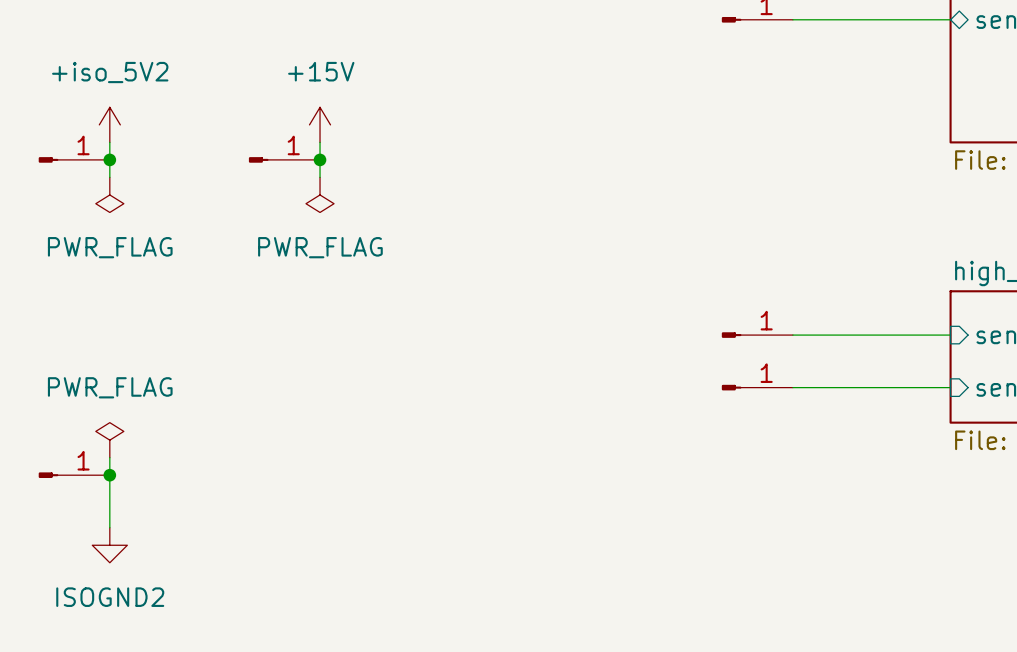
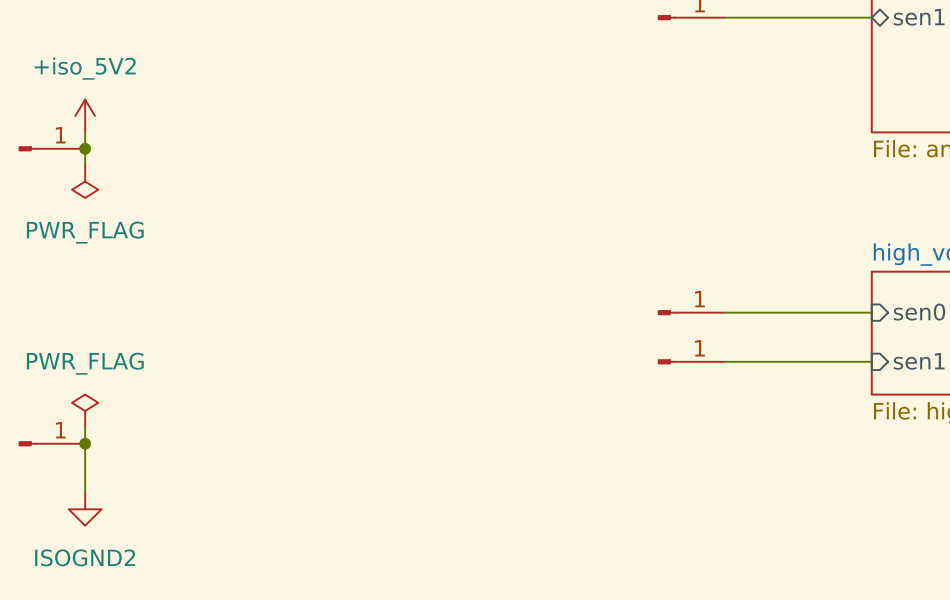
power symbol: +15V (320, 124) -> none
wire: (320, 142) (320, 177) -> none
part: (284, 159) -> none
junction: (320, 159) -> none
power symbol: PWR_FLAG (320, 194) -> none

